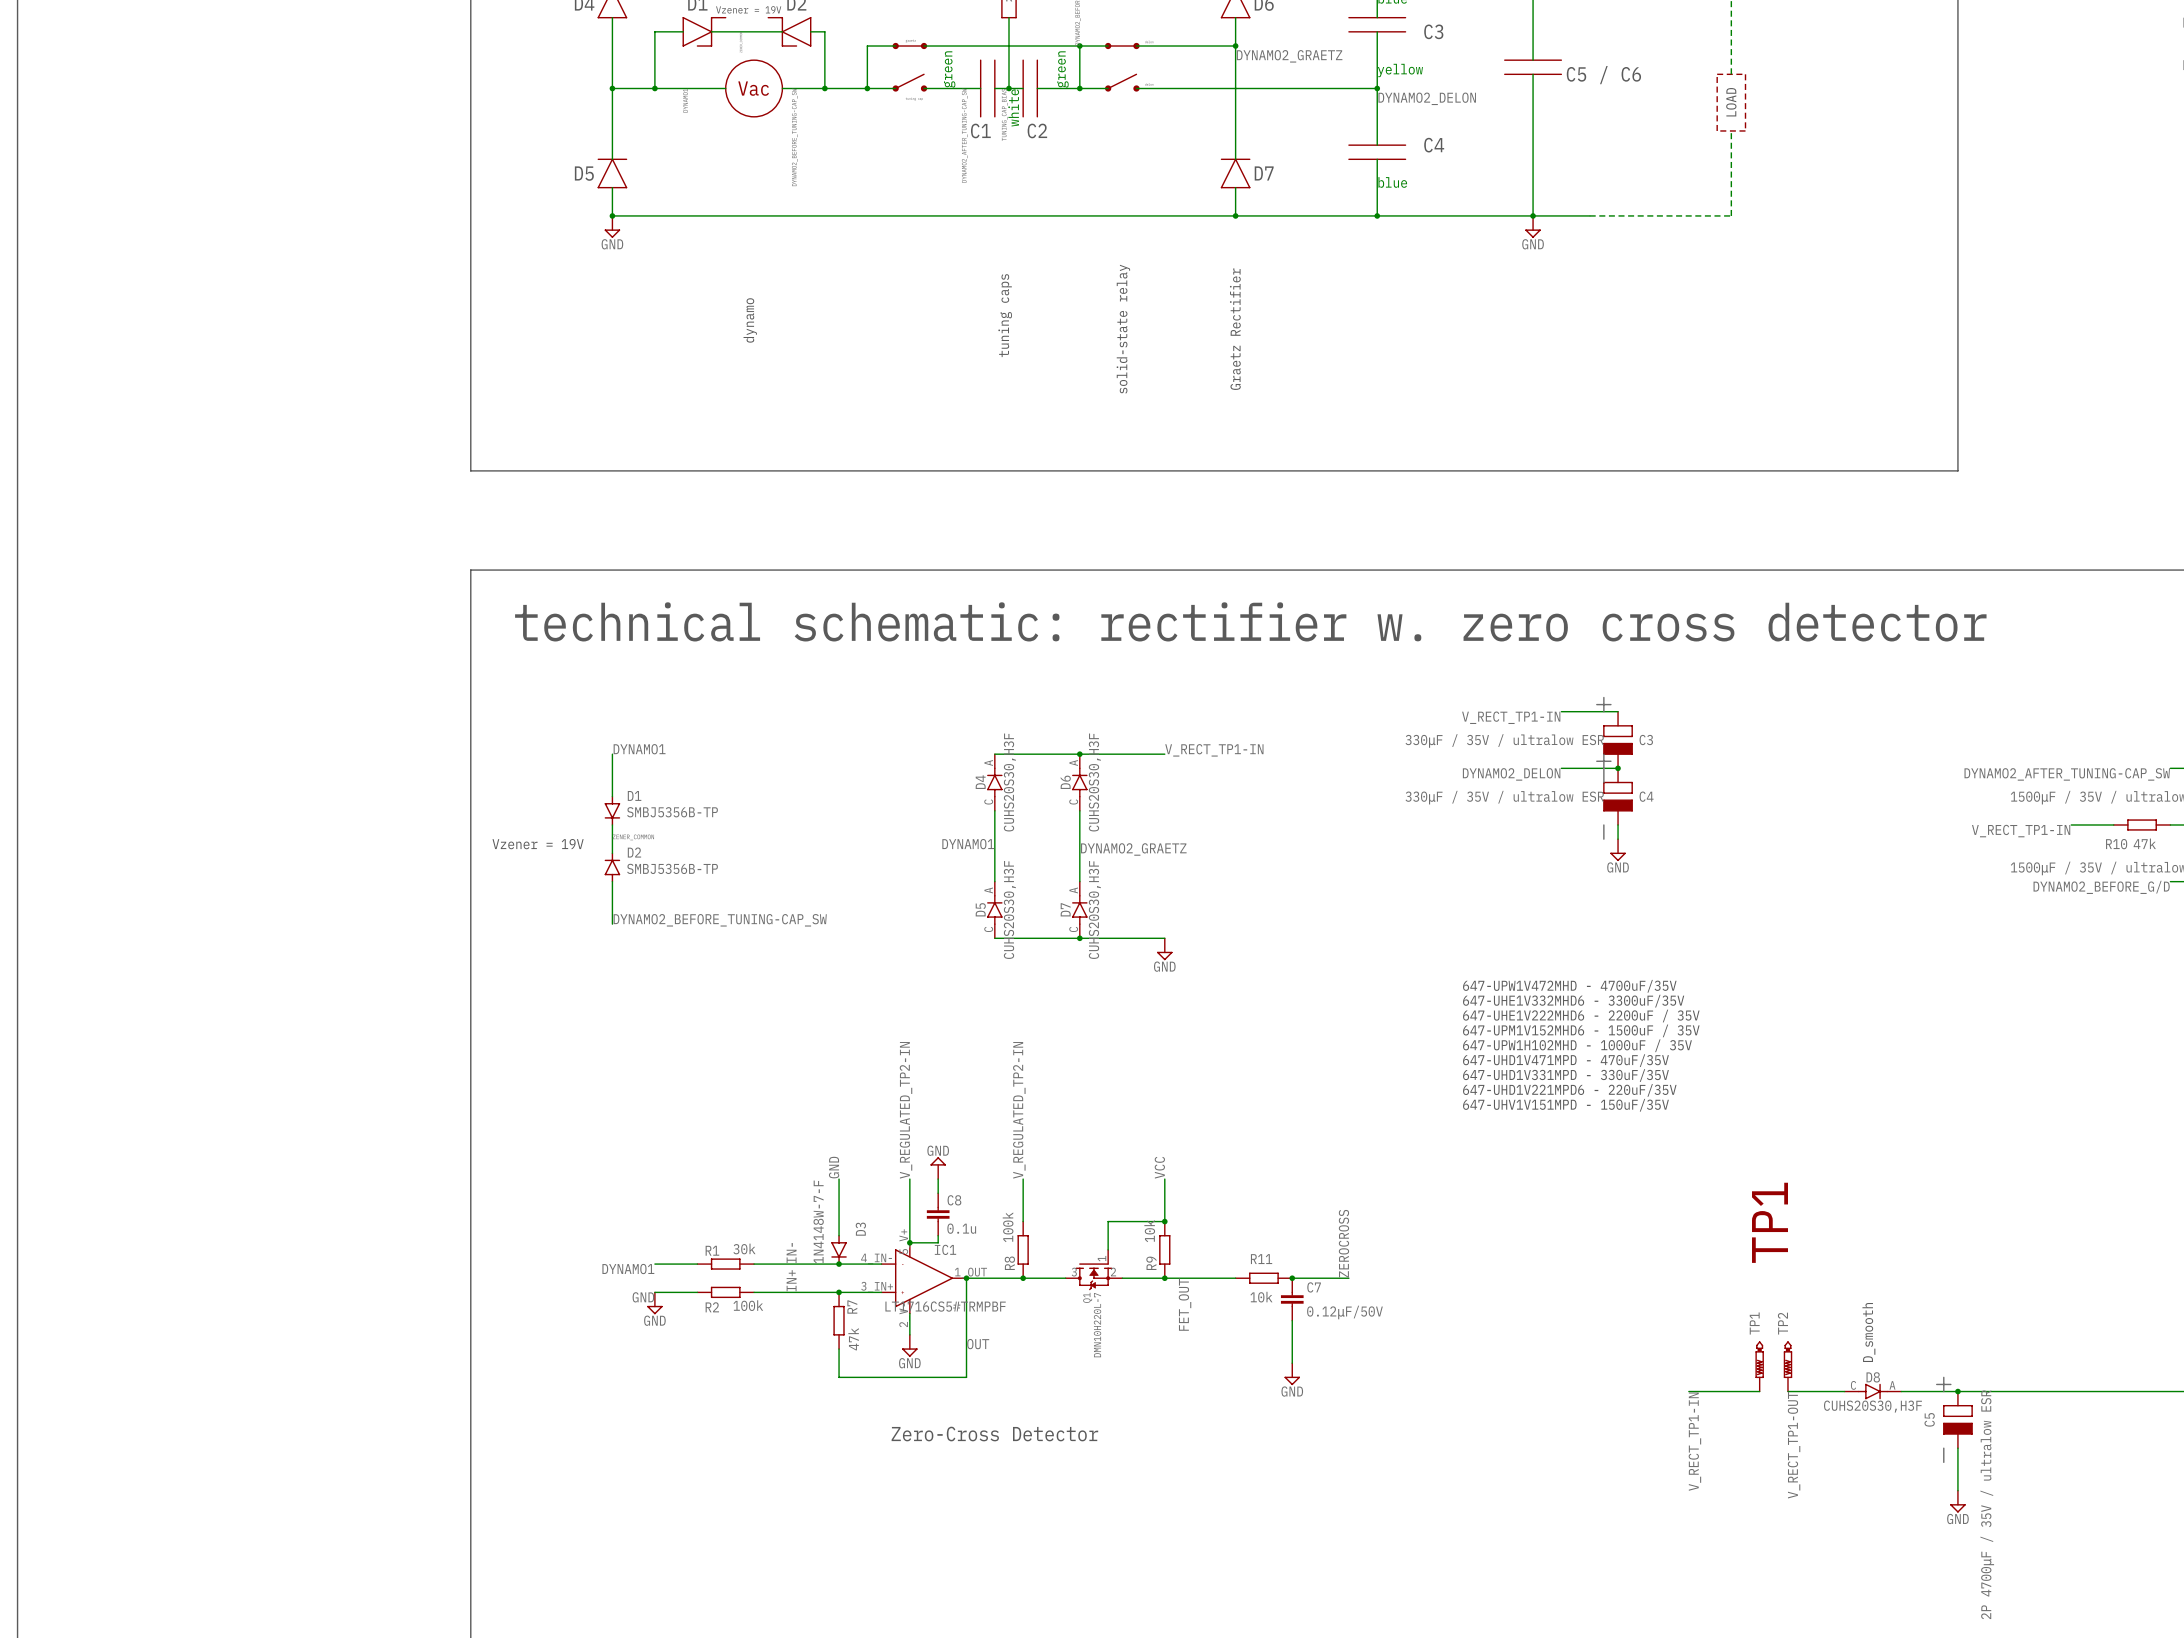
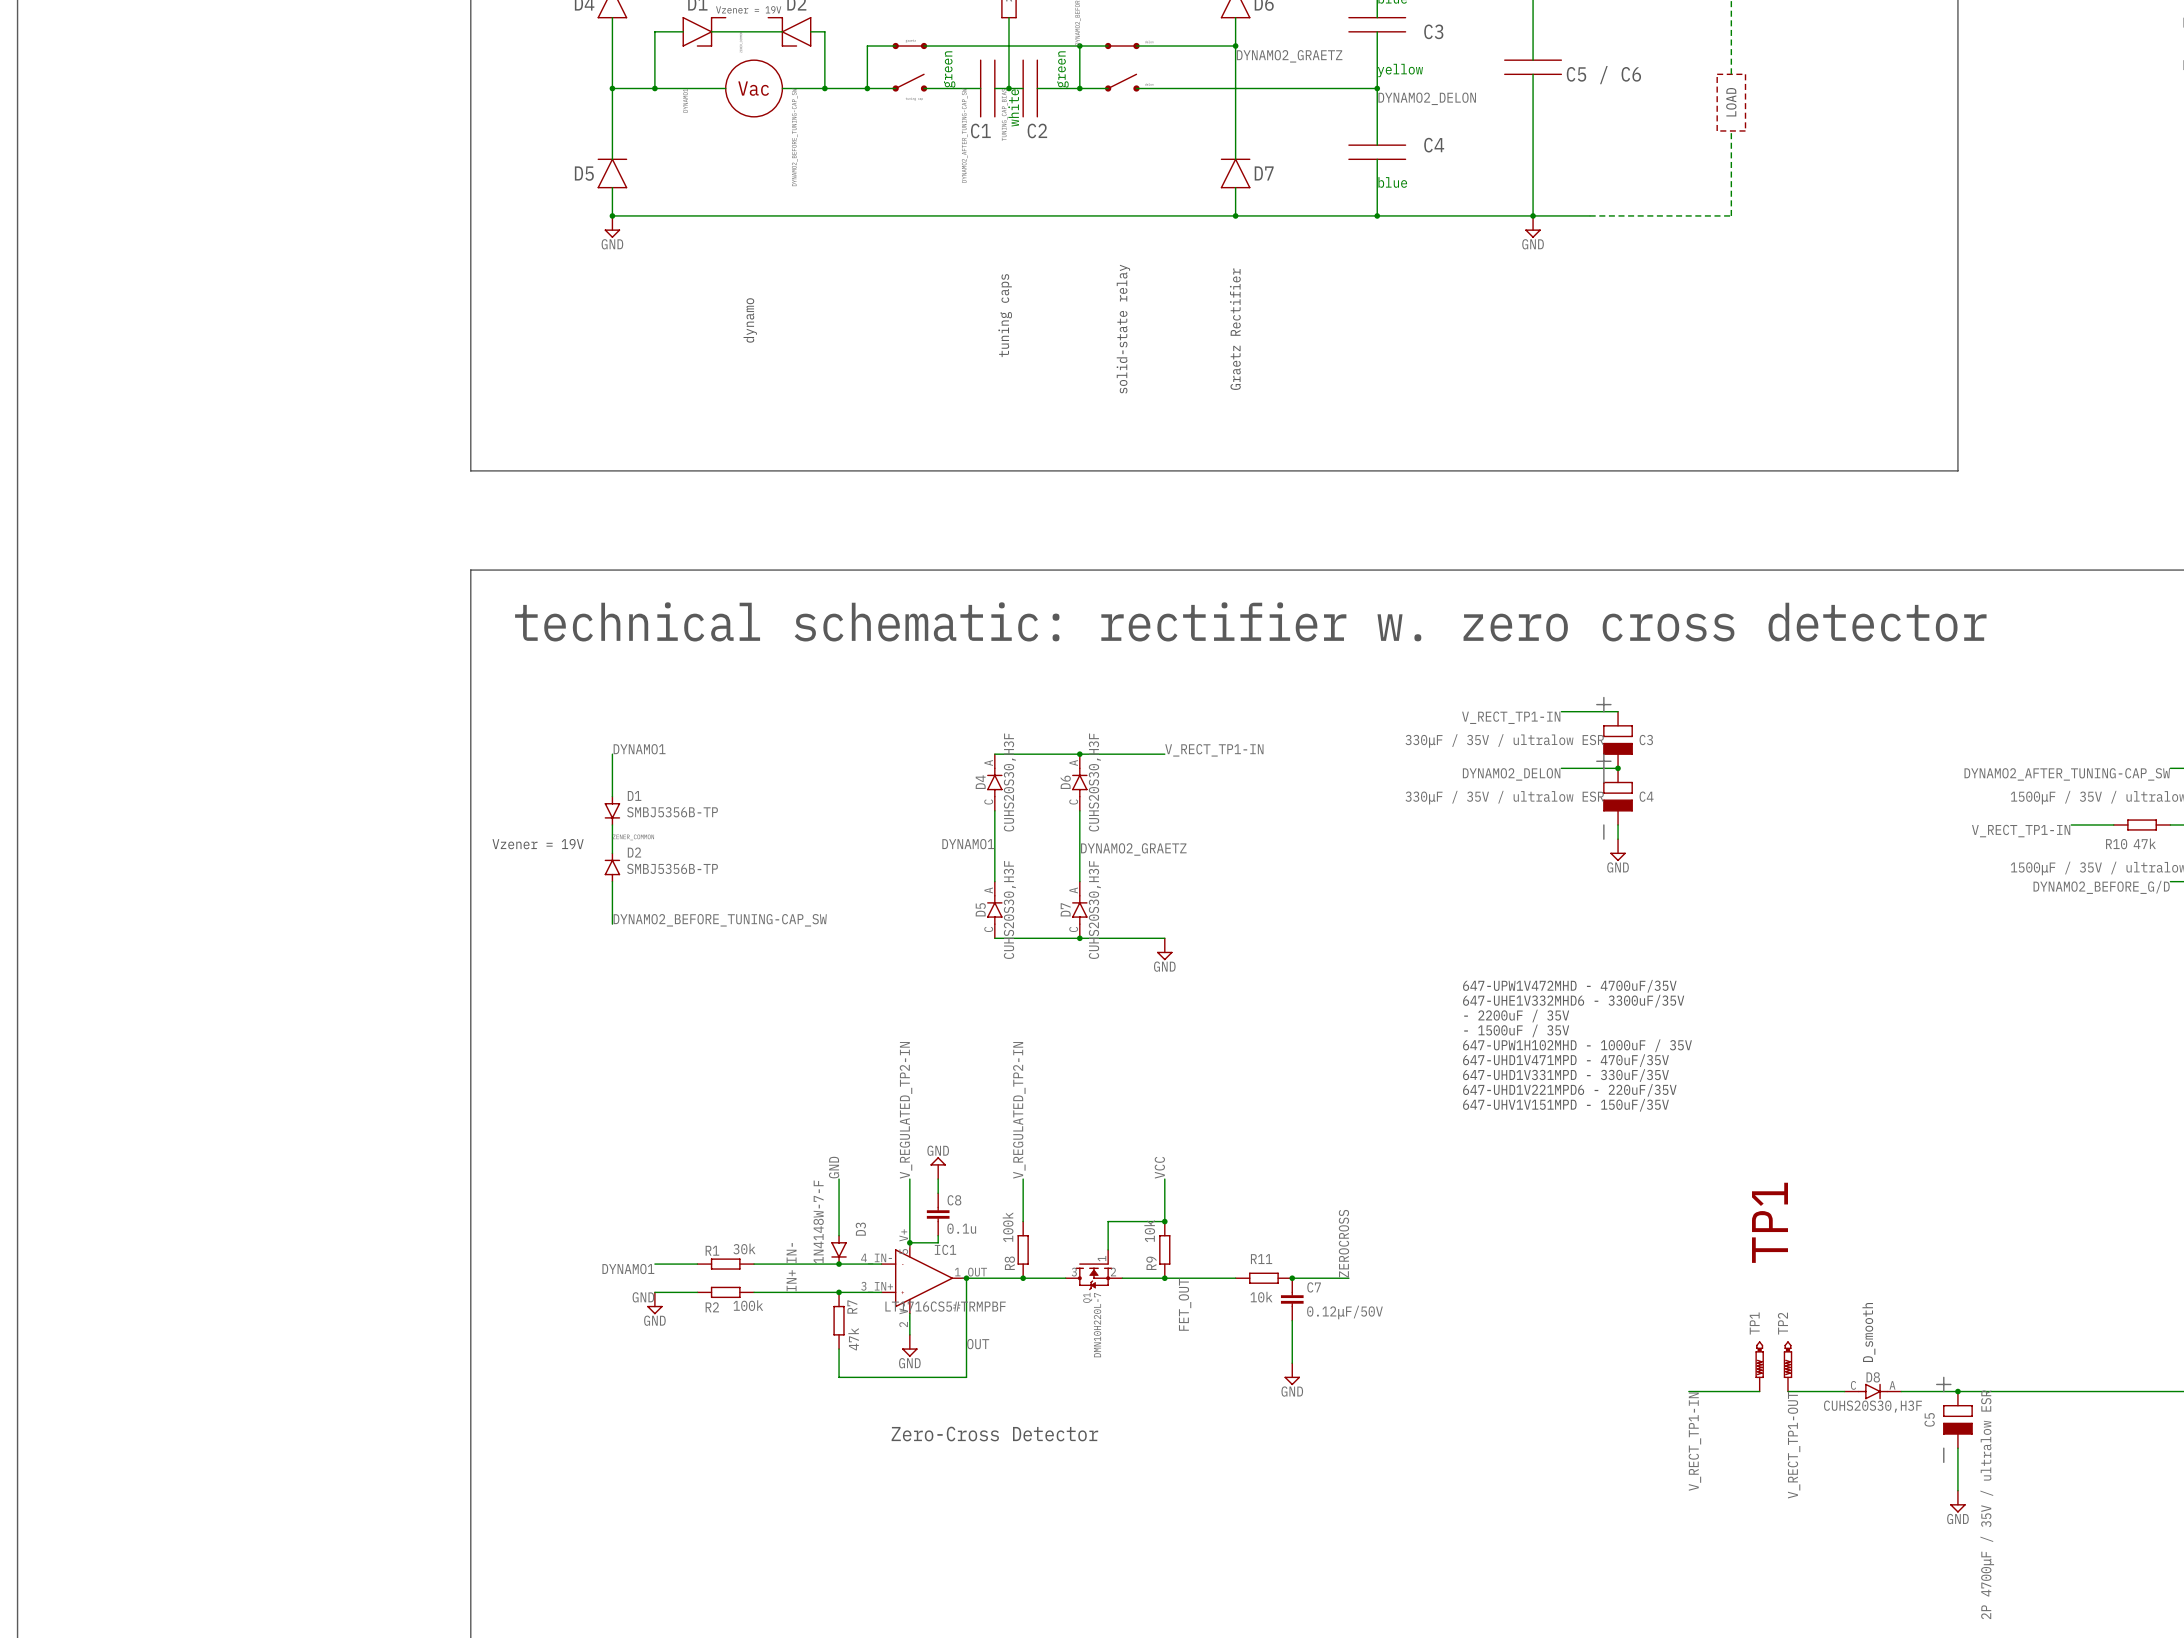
text: 647-UHE1V222MHD6 - 2200uF / 35V (1581, 1016) -> - 2200uF / 35V (1516, 1016)
text: 647-UPM1V152MHD6 - 1500uF / 35V (1581, 1030) -> - 1500uF / 35V (1516, 1030)

